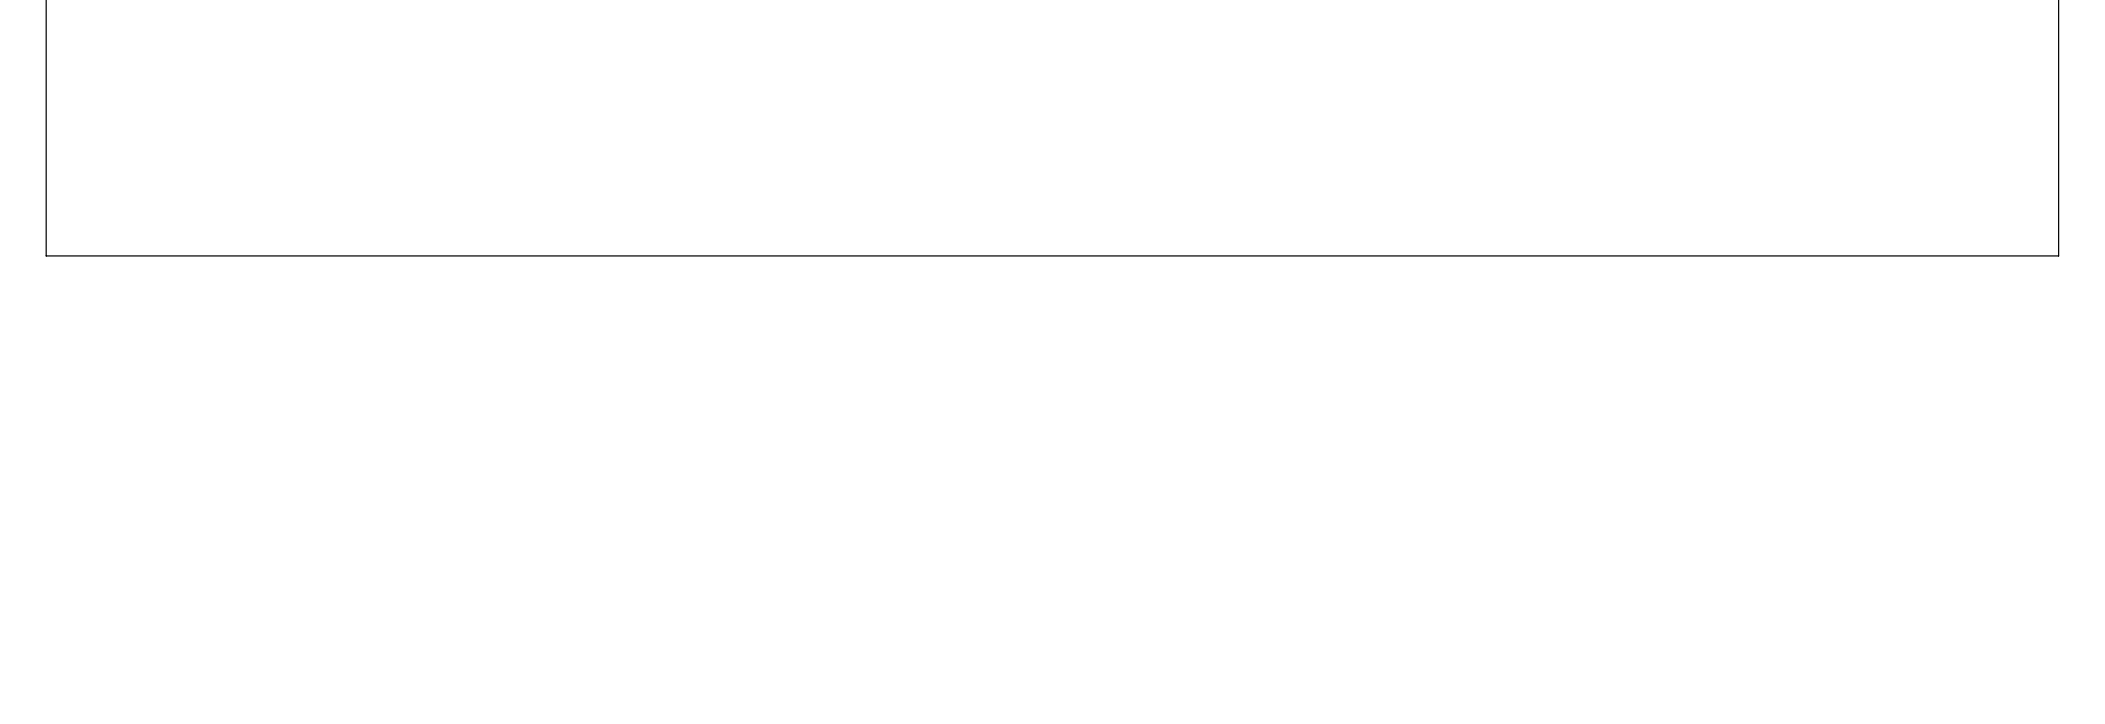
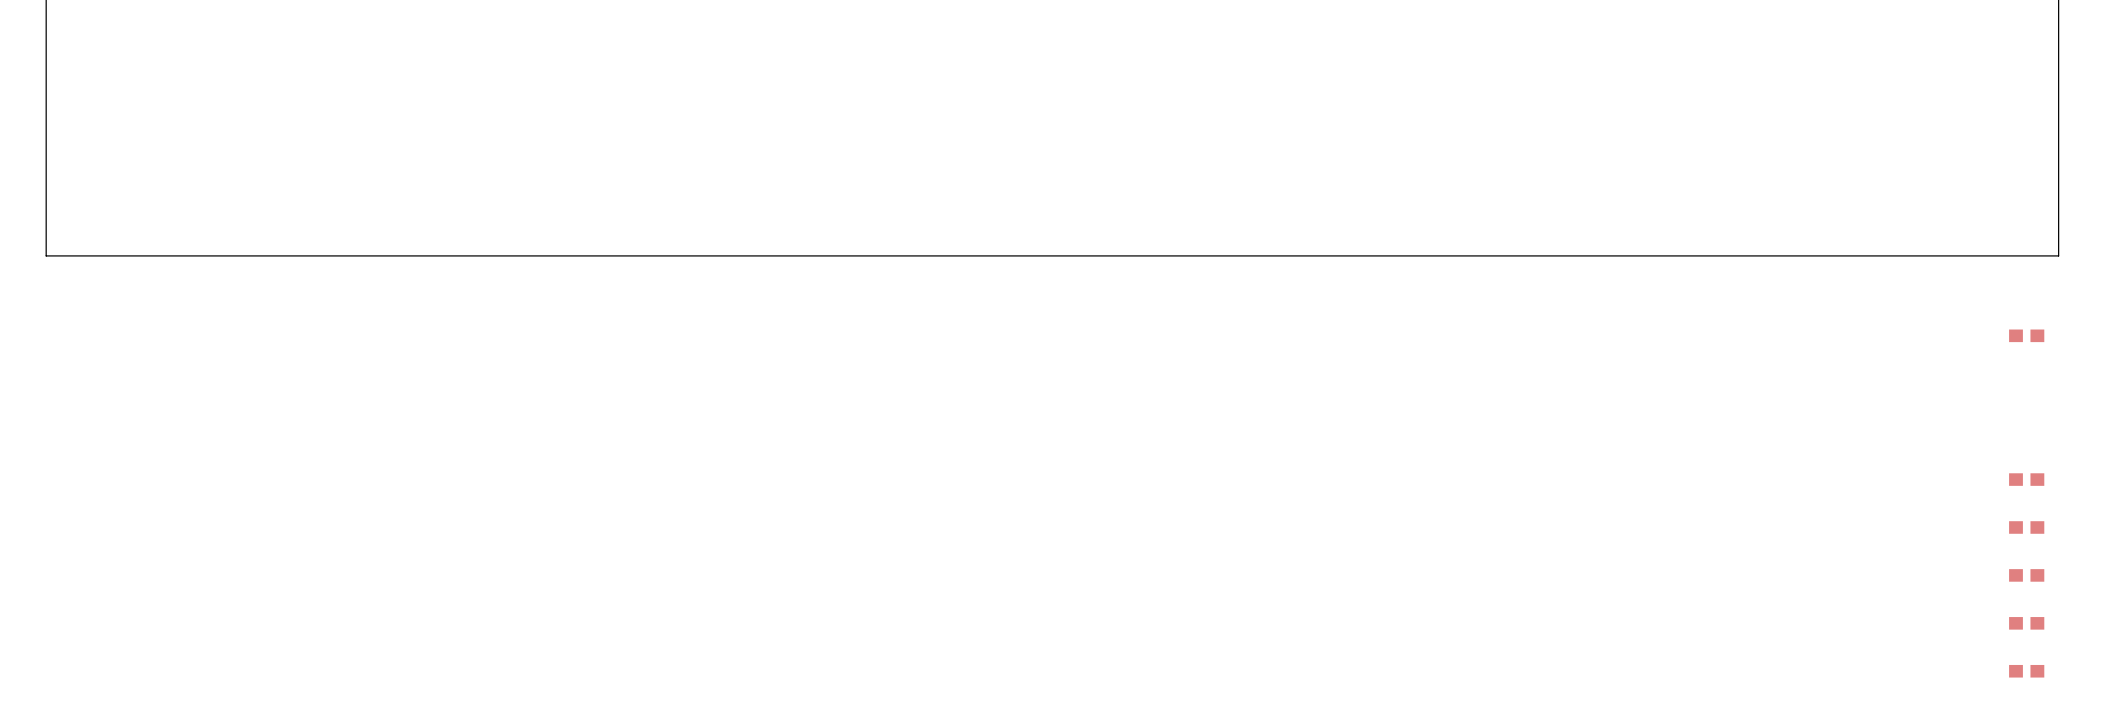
part: none -> (2026, 335)
part: none -> (2026, 479)
part: none -> (2026, 527)
part: none -> (2026, 575)
part: none -> (2026, 623)
part: none -> (2026, 671)

